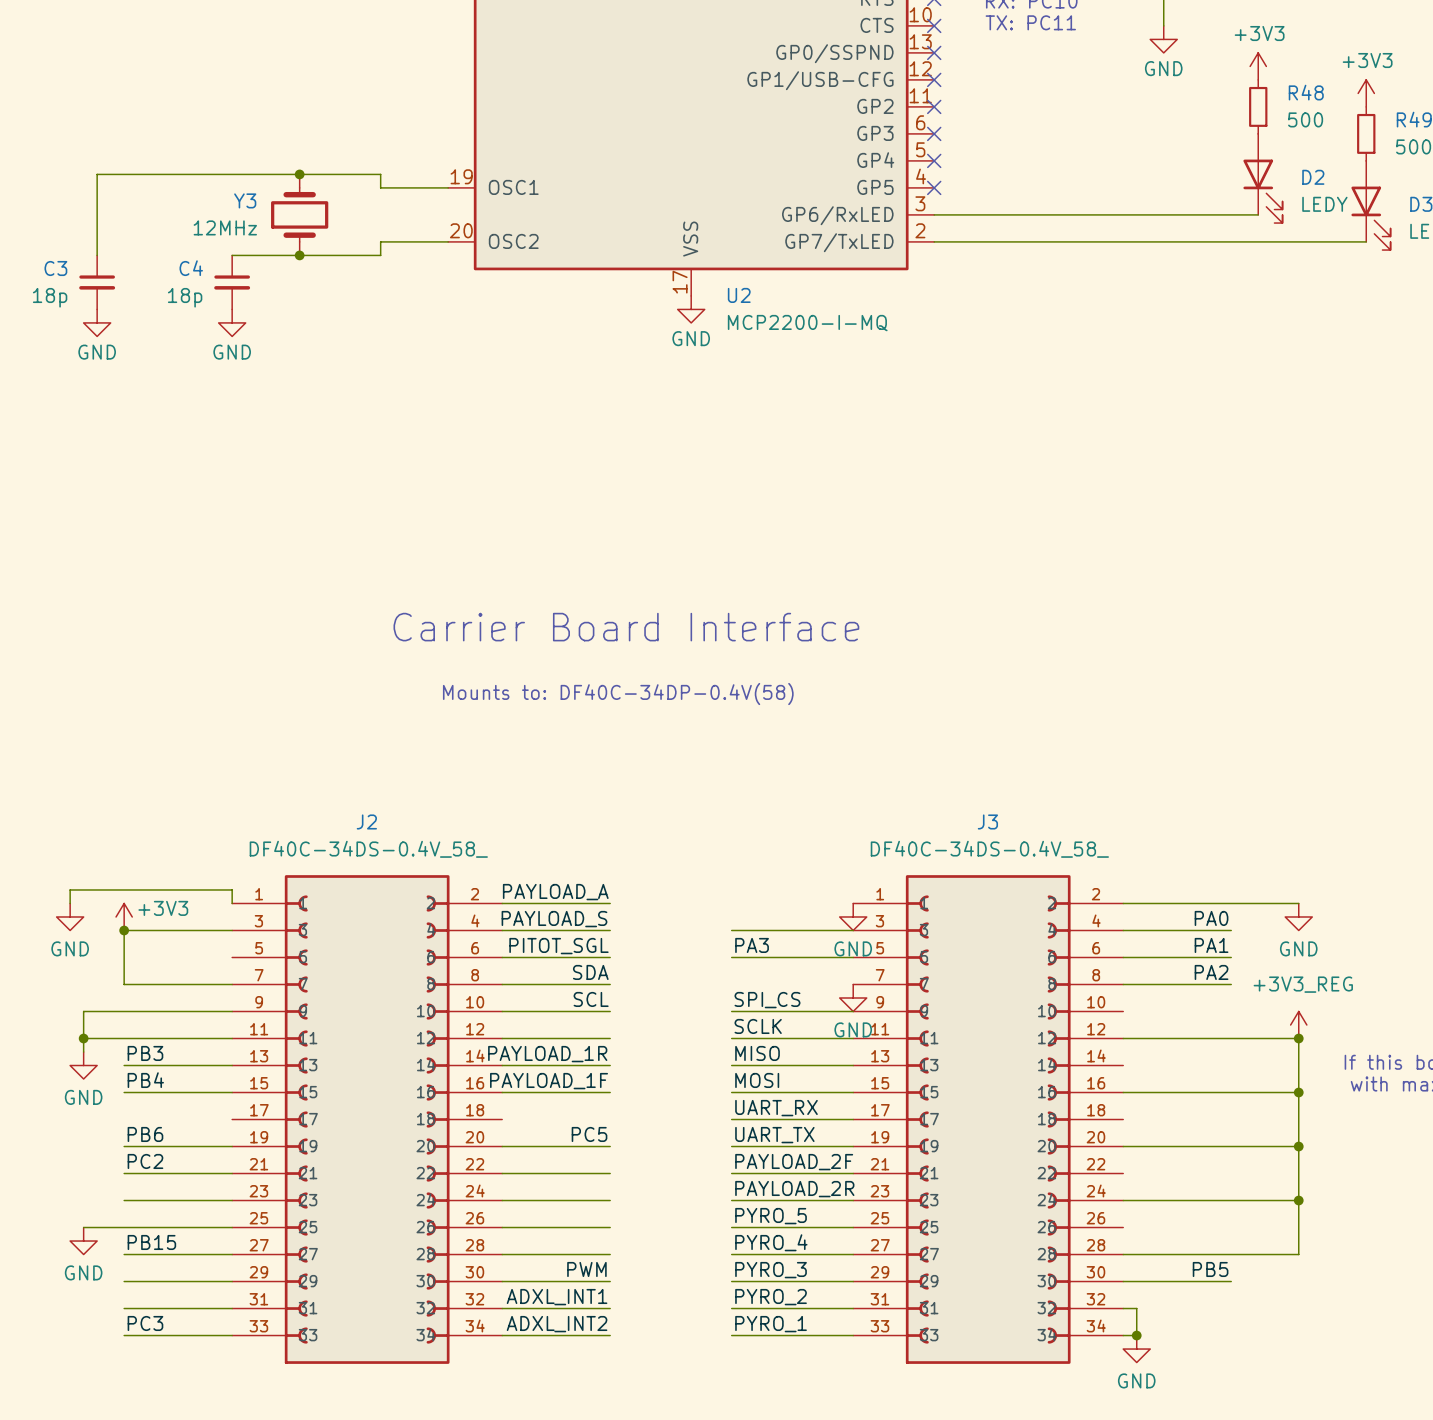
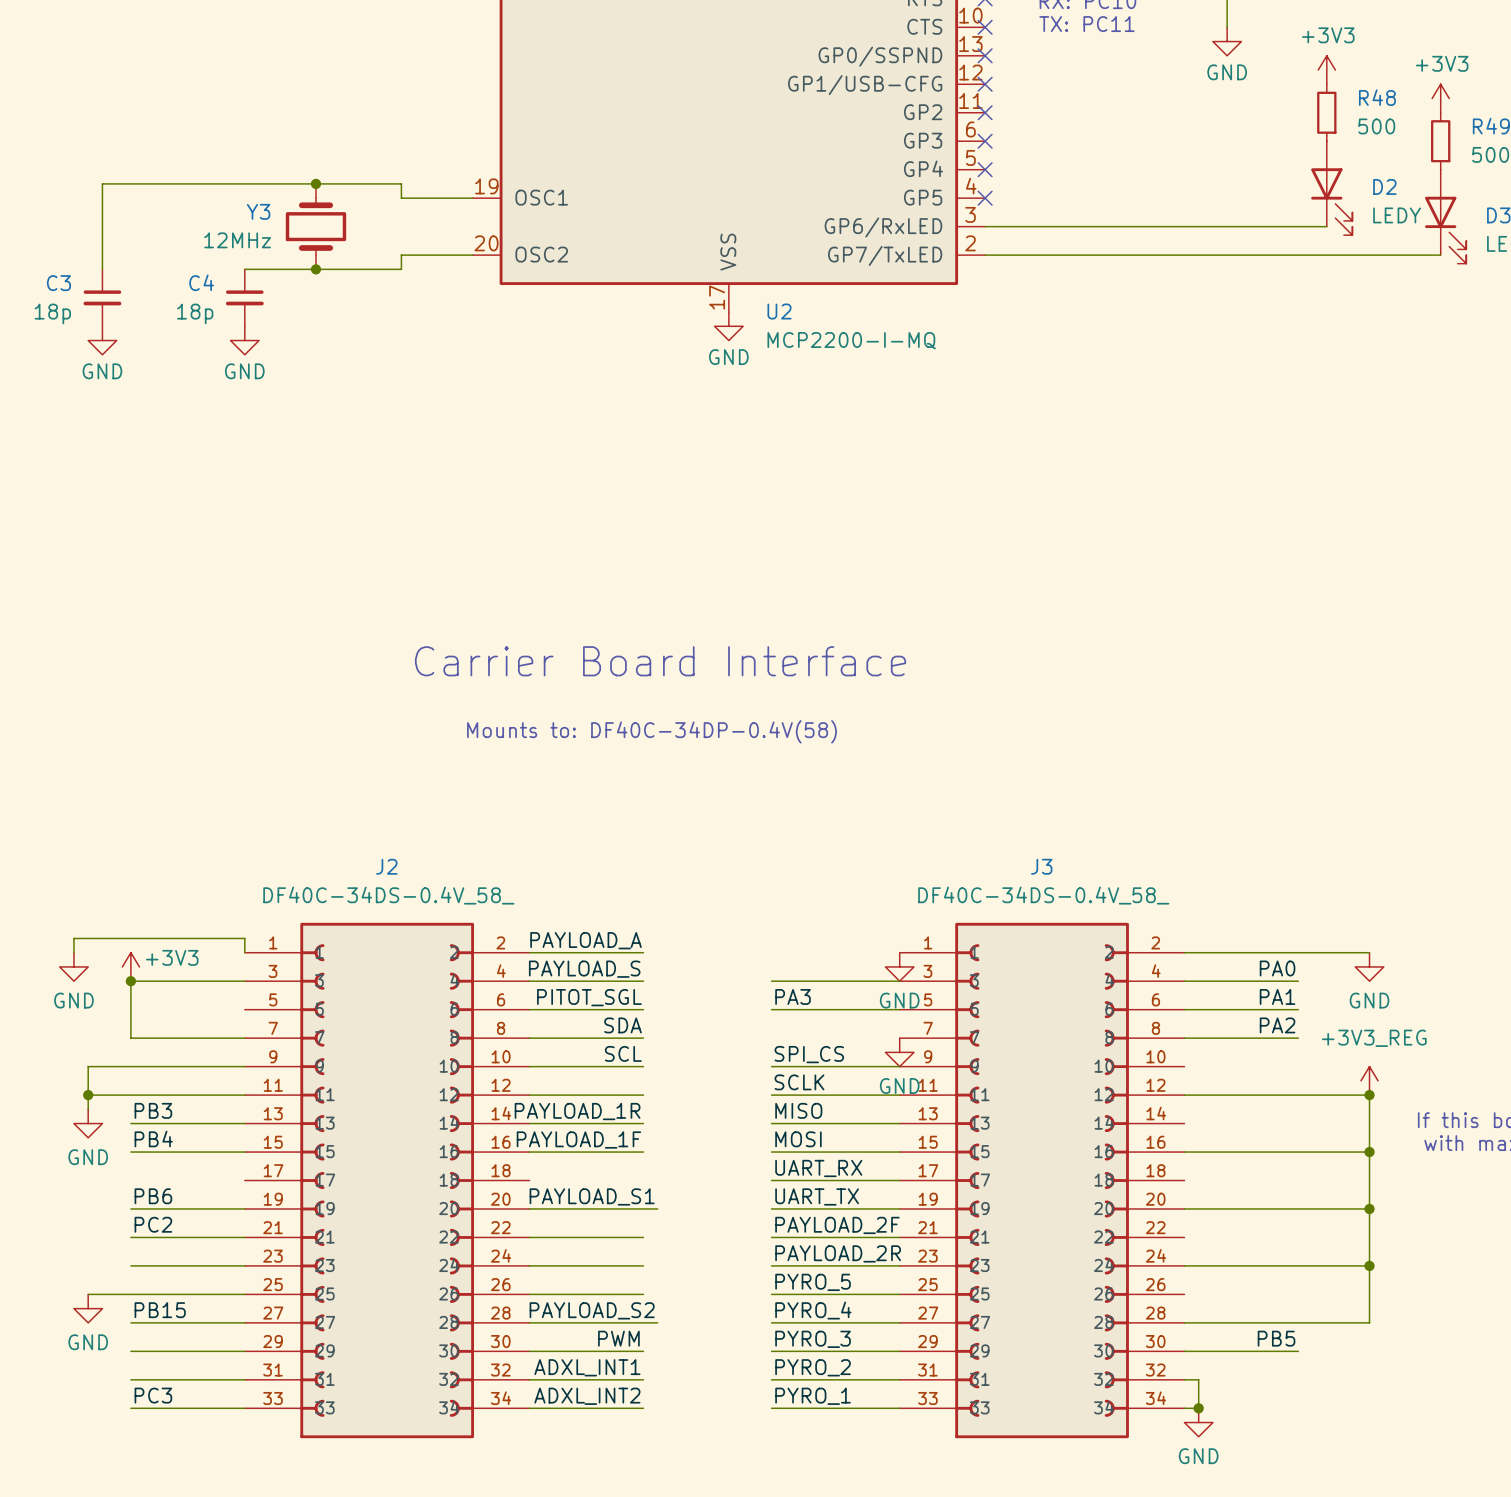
label: PC5 (589, 1134) -> none
label: none -> PAYLOAD_S1 (592, 1196)
wire: none -> (643, 1208) (657, 1208)
label: none -> PAYLOAD_S2 (592, 1310)
wire: none -> (643, 1322) (657, 1322)

